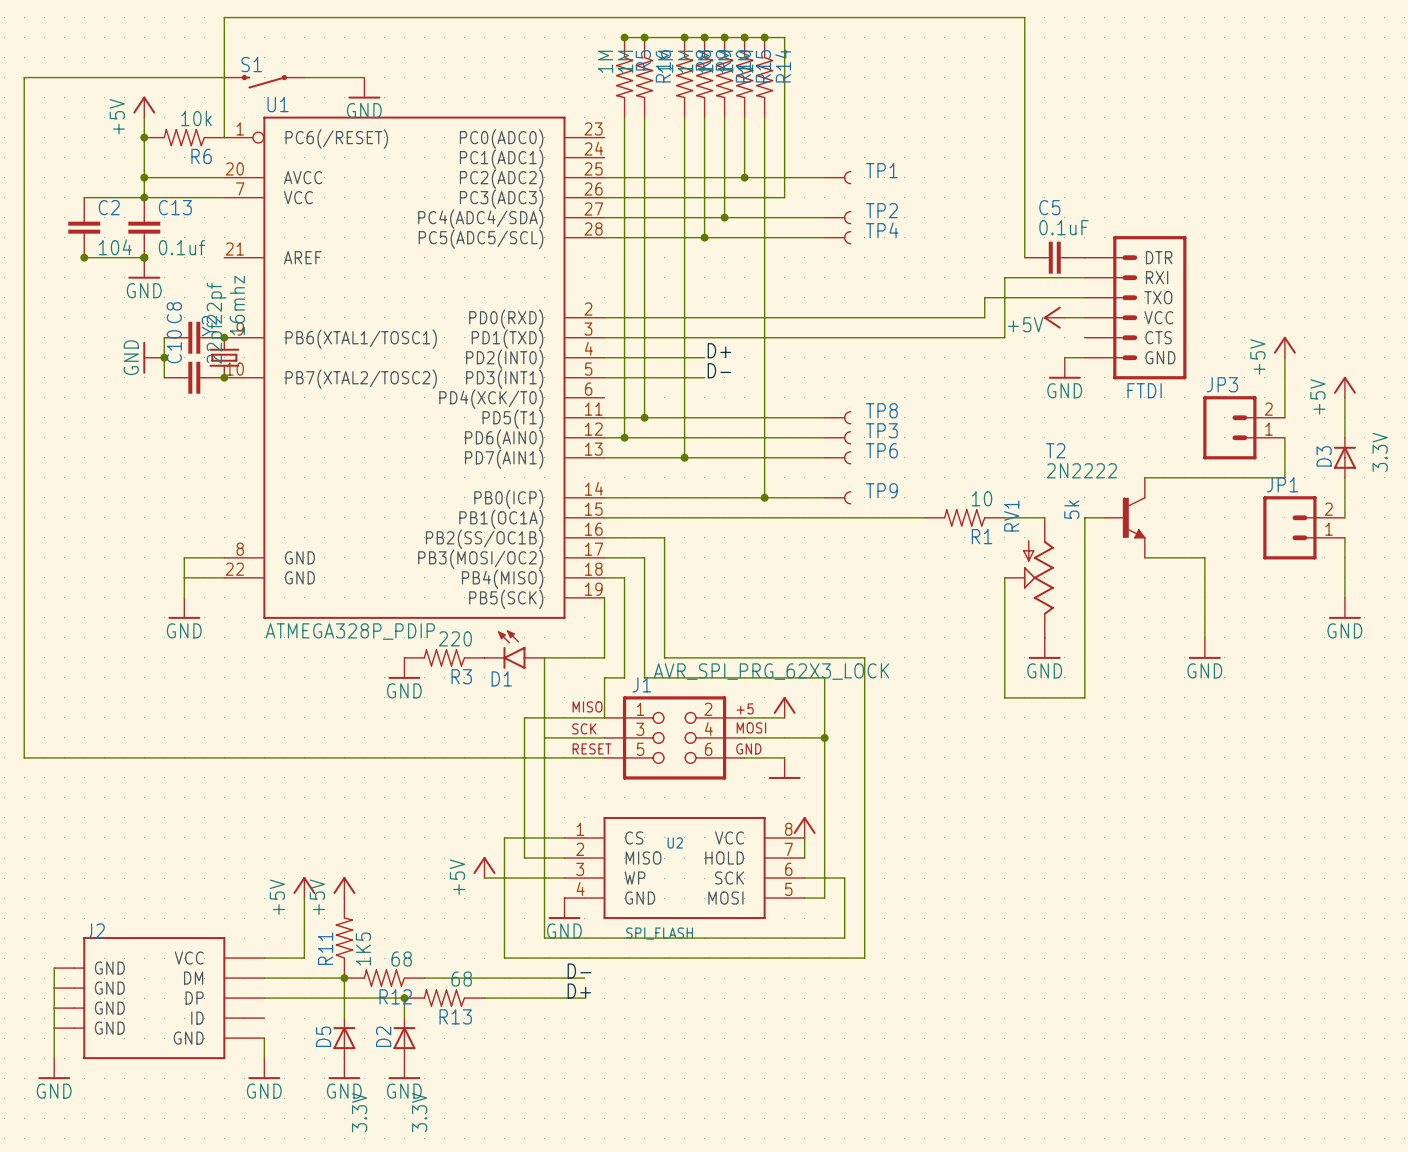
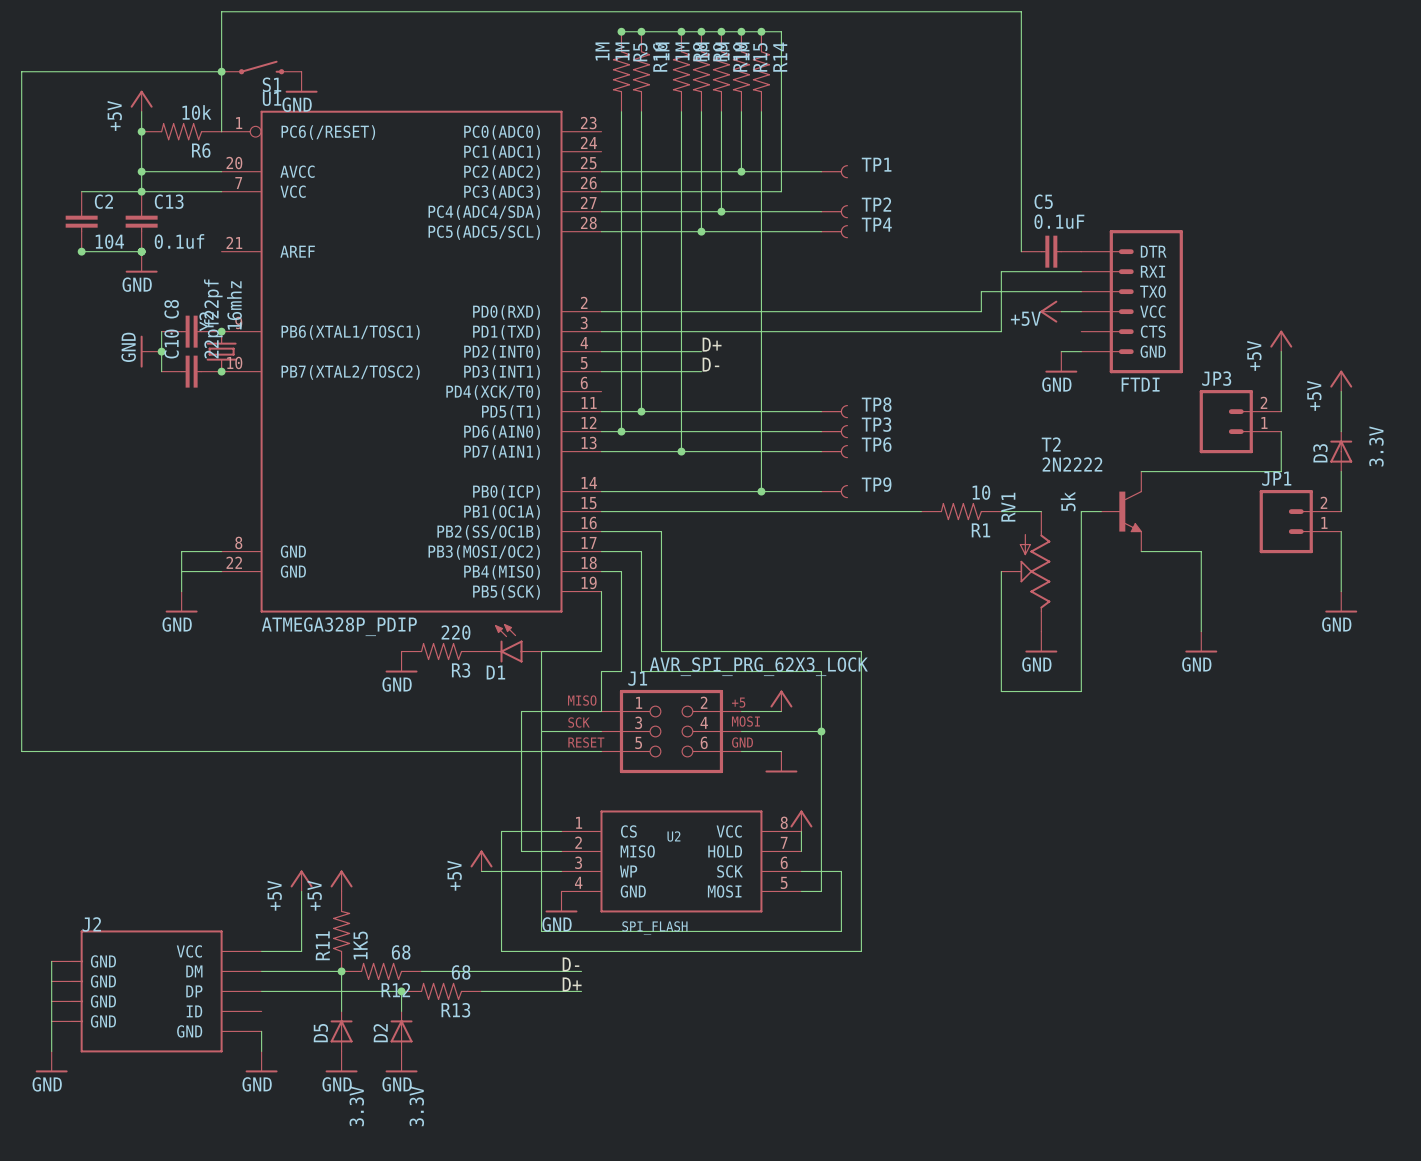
junction: none -> (221, 71)
wire: (304, 77) (364, 77) -> none
S1 rotation: 0° (264, 81) -> 180° (261, 67)
power symbol position: GND (364, 88) -> GND (301, 82)

